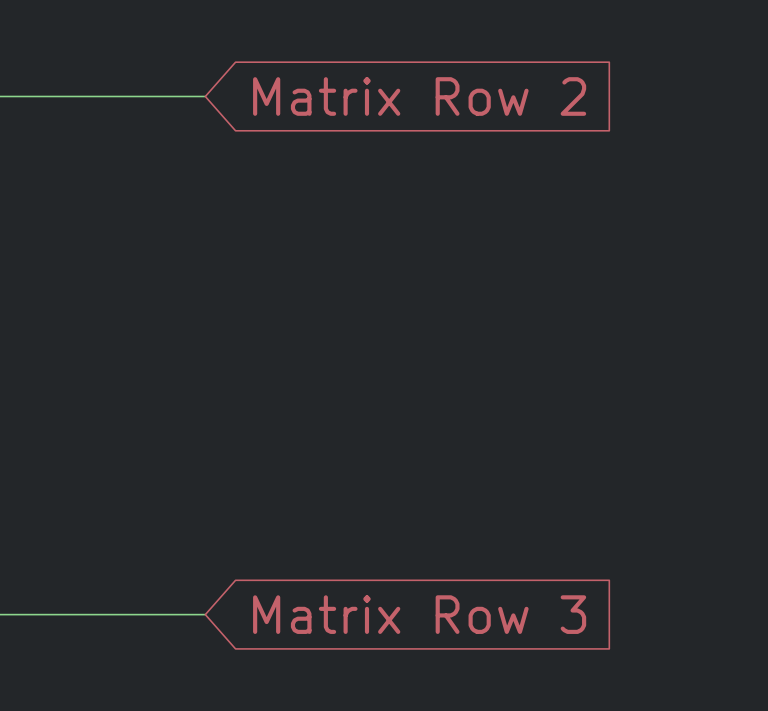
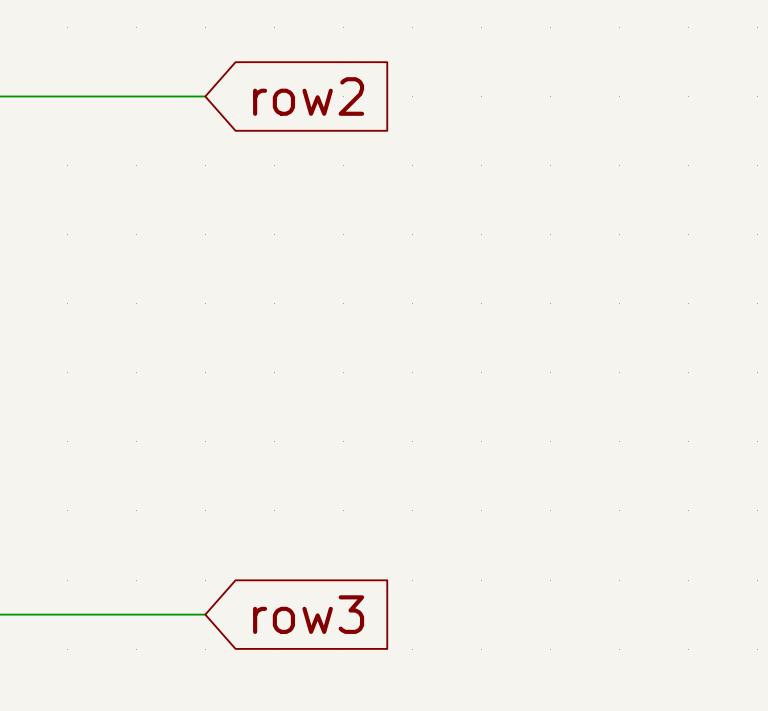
global label: Matrix Row 2 (419, 96) -> row2 (308, 96)
global label: Matrix Row 3 (419, 614) -> row3 (308, 614)

